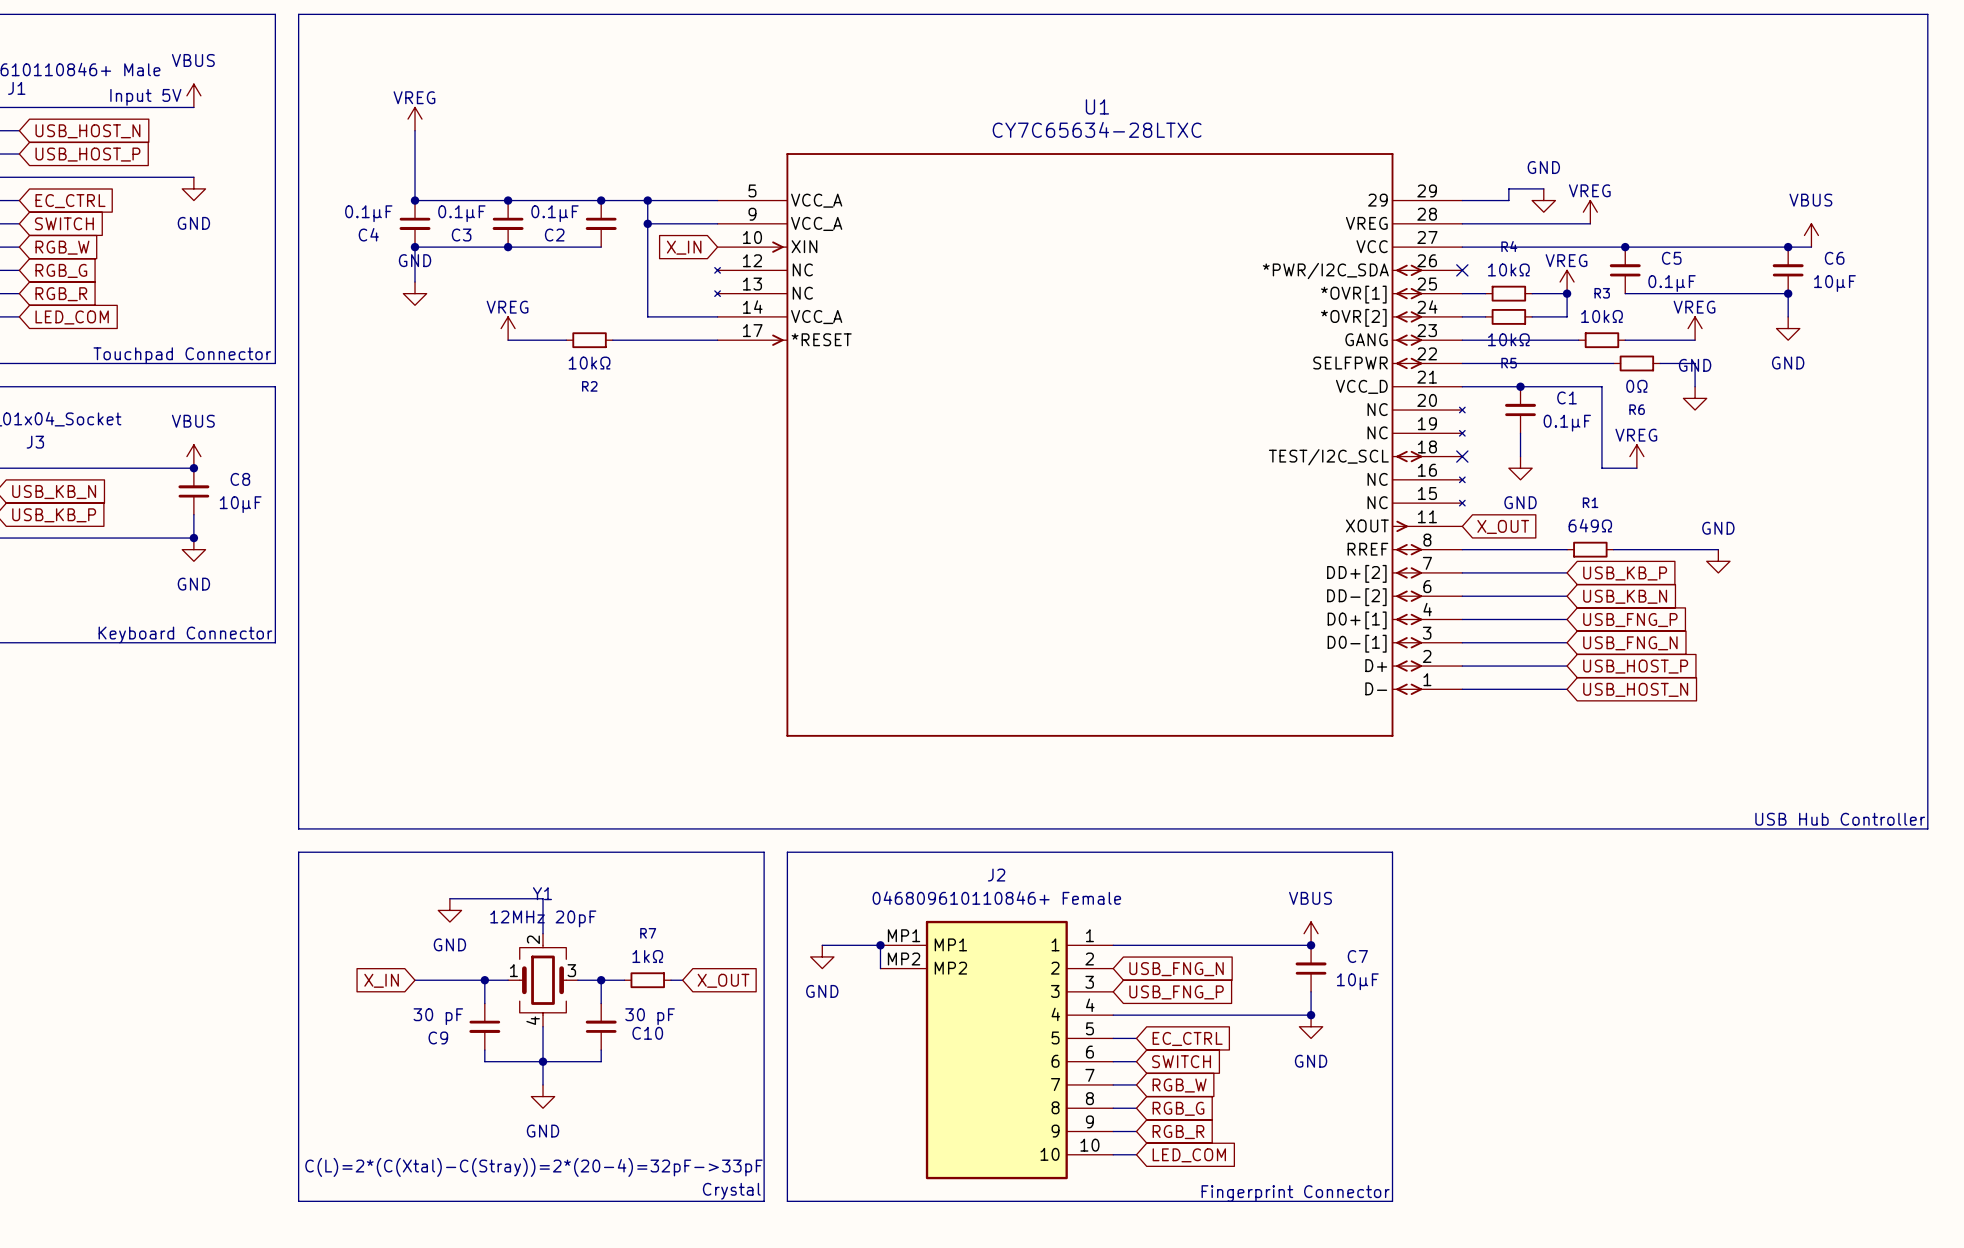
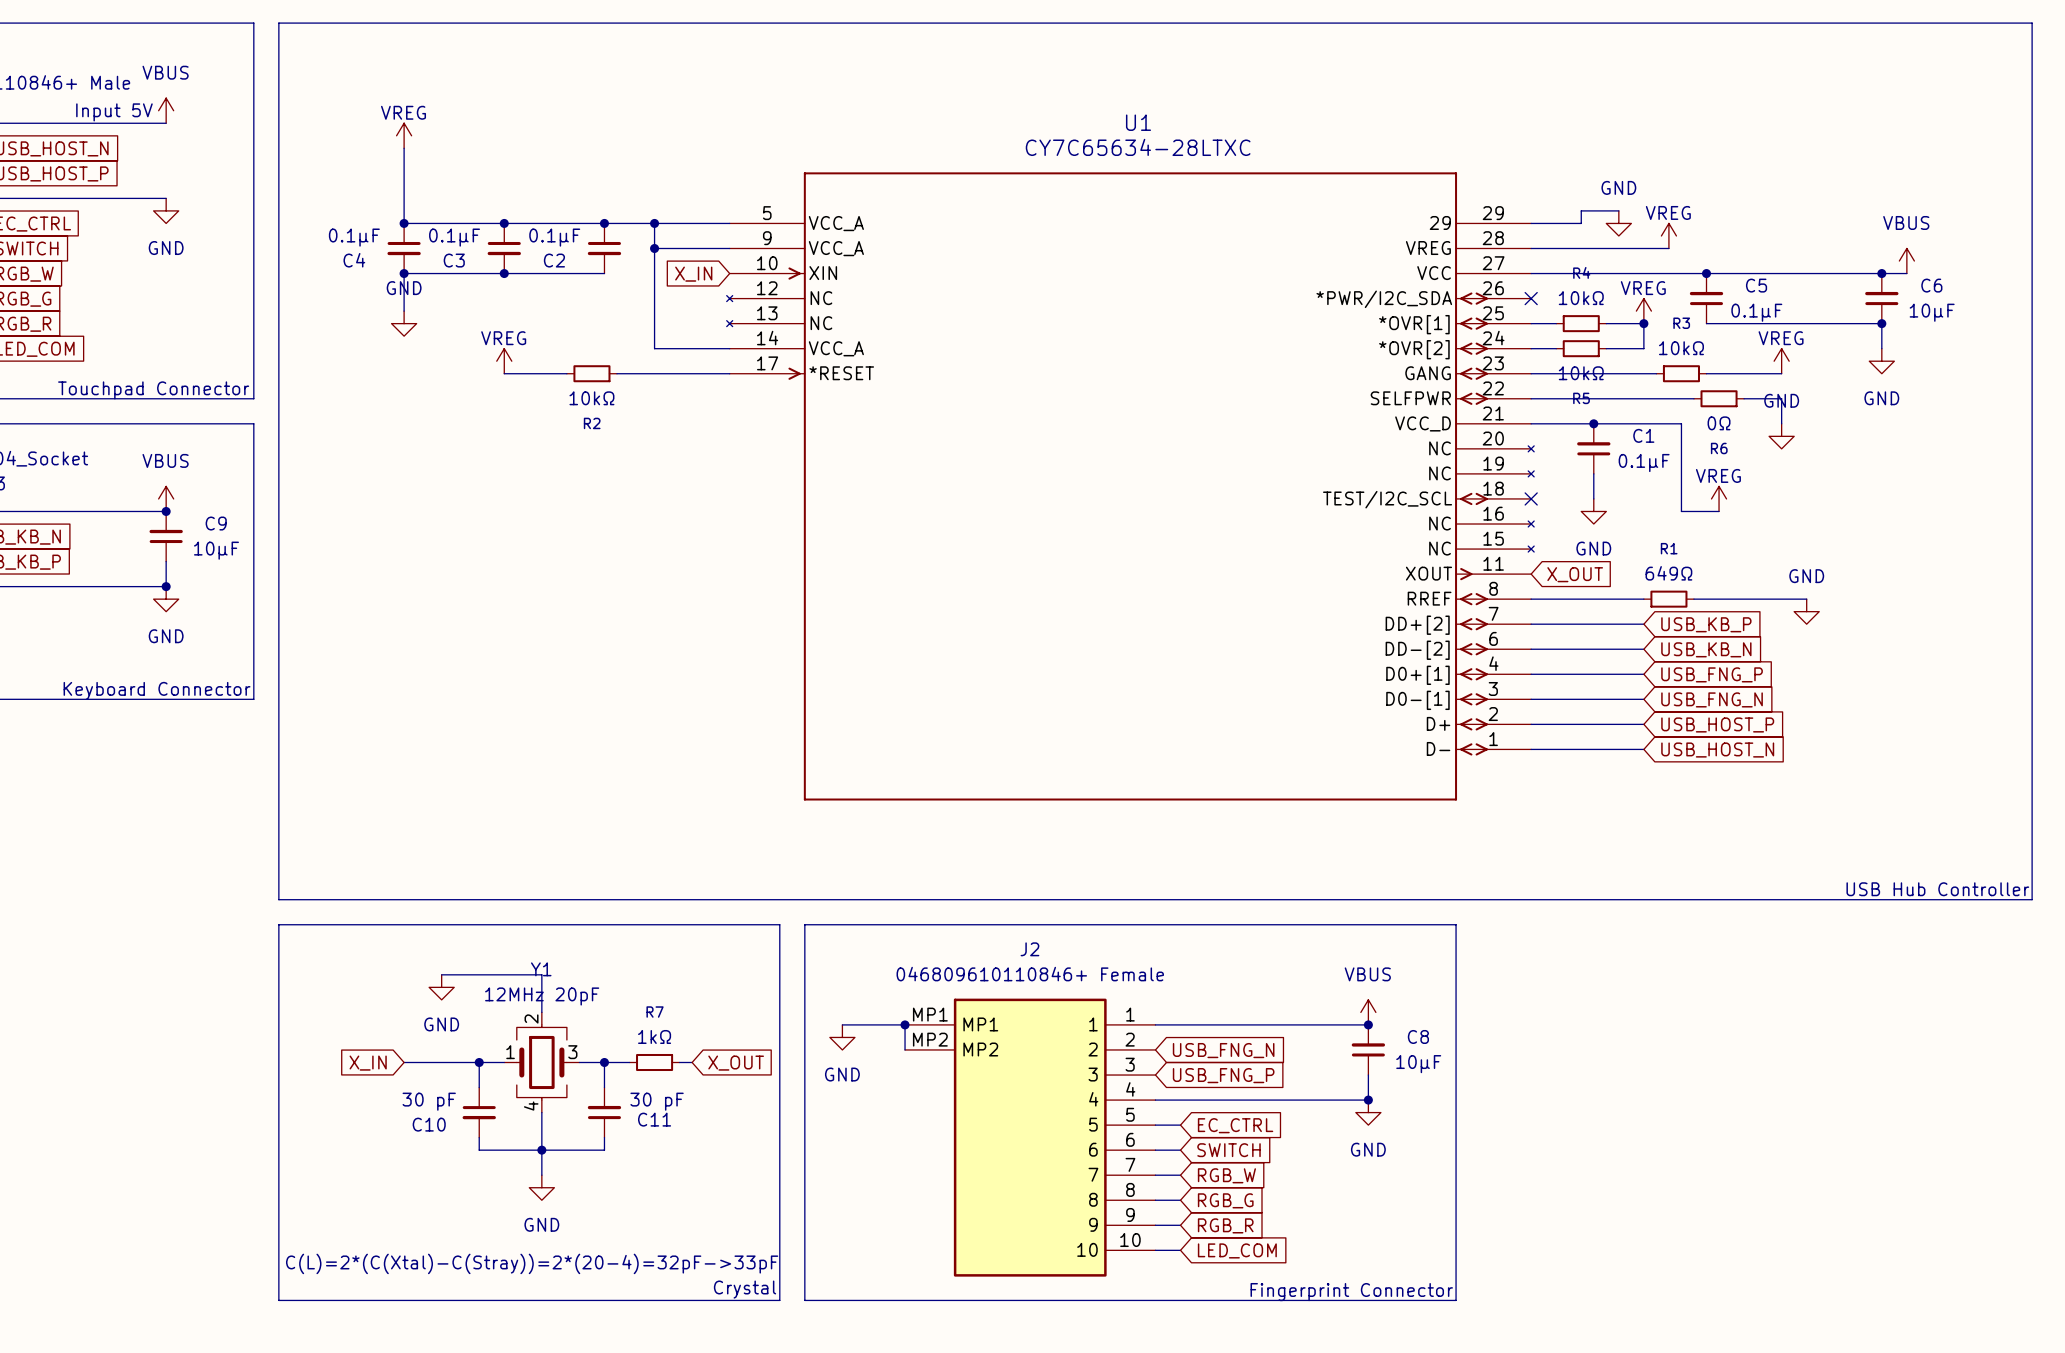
C8 name: C8 (240, 479) -> C9 (216, 523)
C7 name: C7 (1357, 956) -> C8 (1418, 1036)
C10 name: C10 (647, 1033) -> C11 (654, 1119)
C9 name: C9 (438, 1037) -> C10 (429, 1124)

